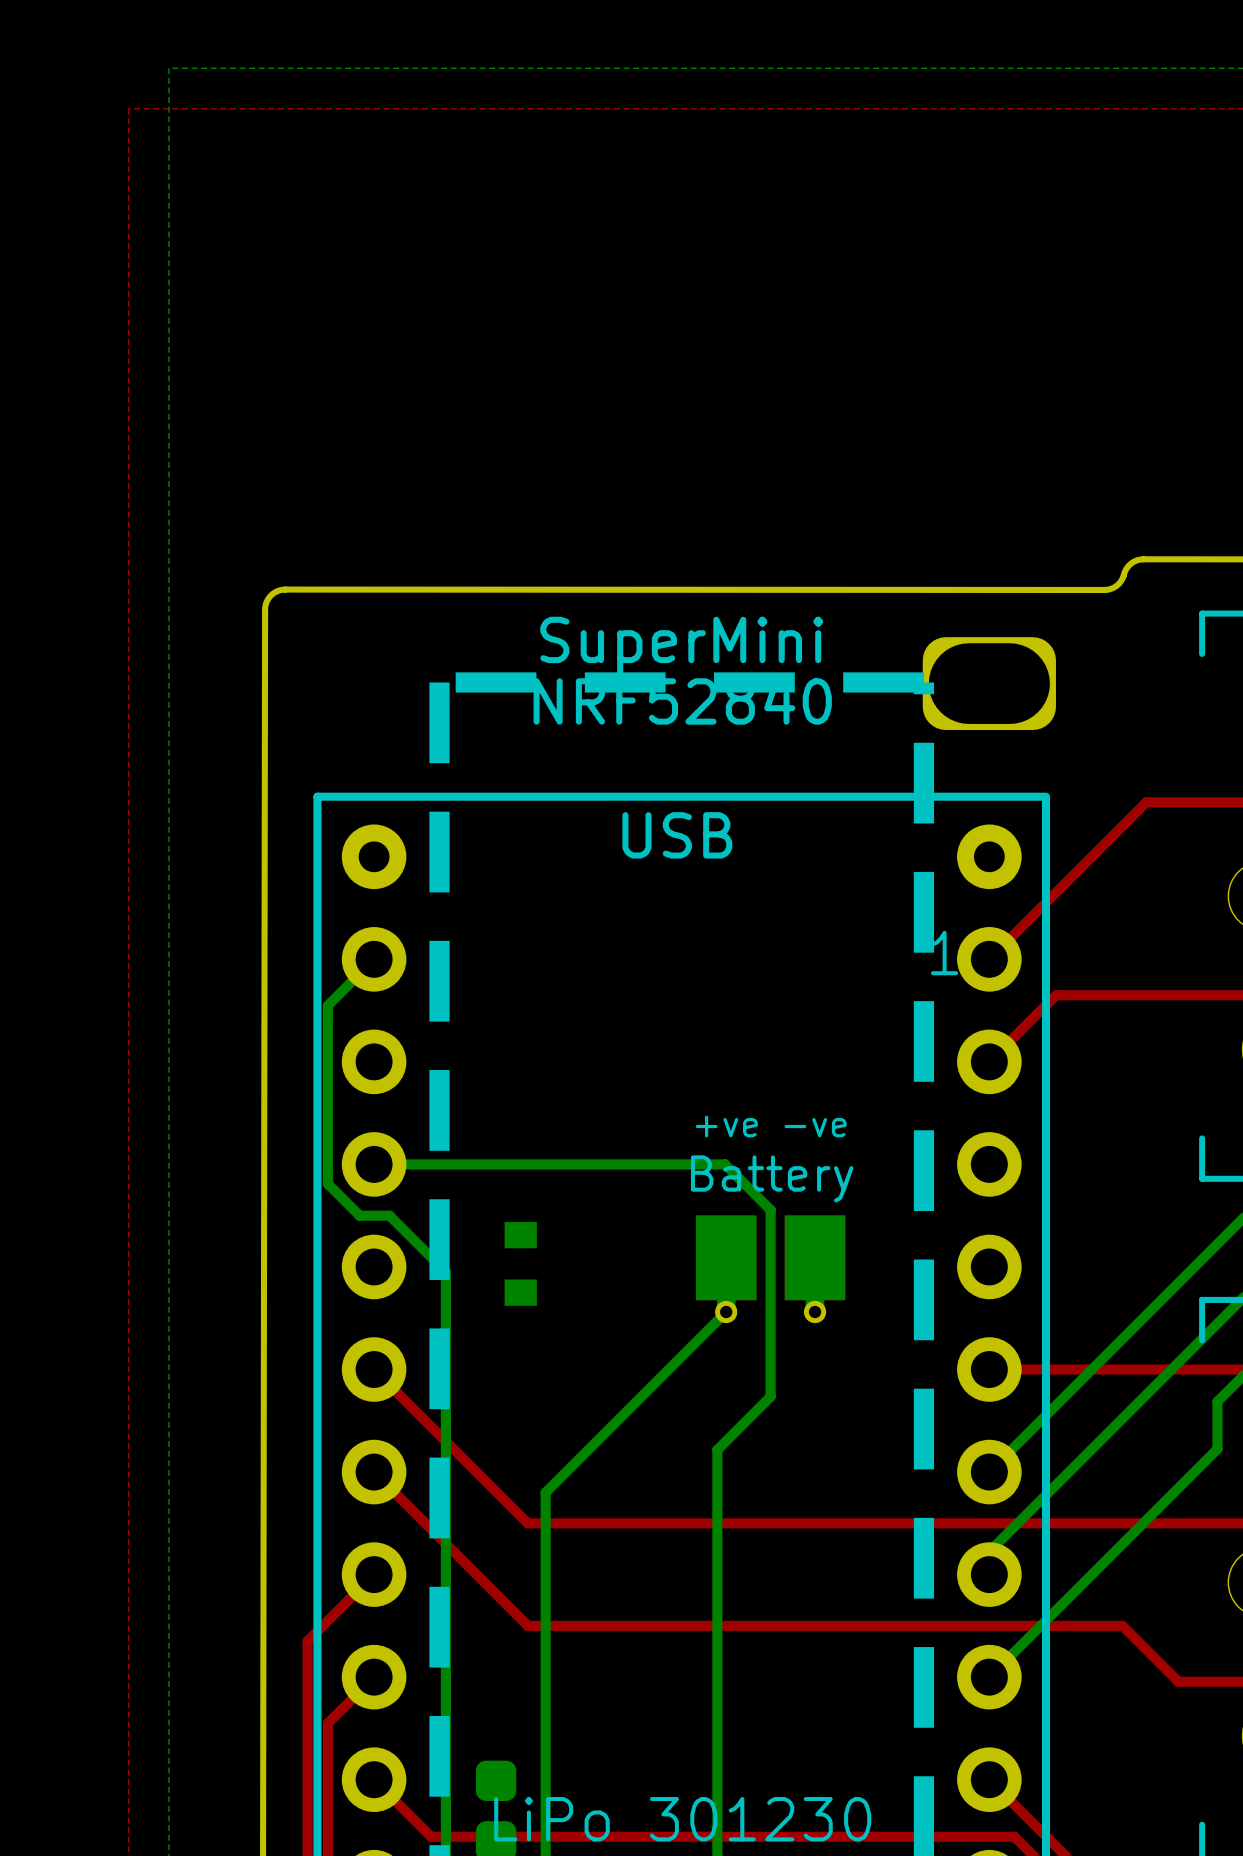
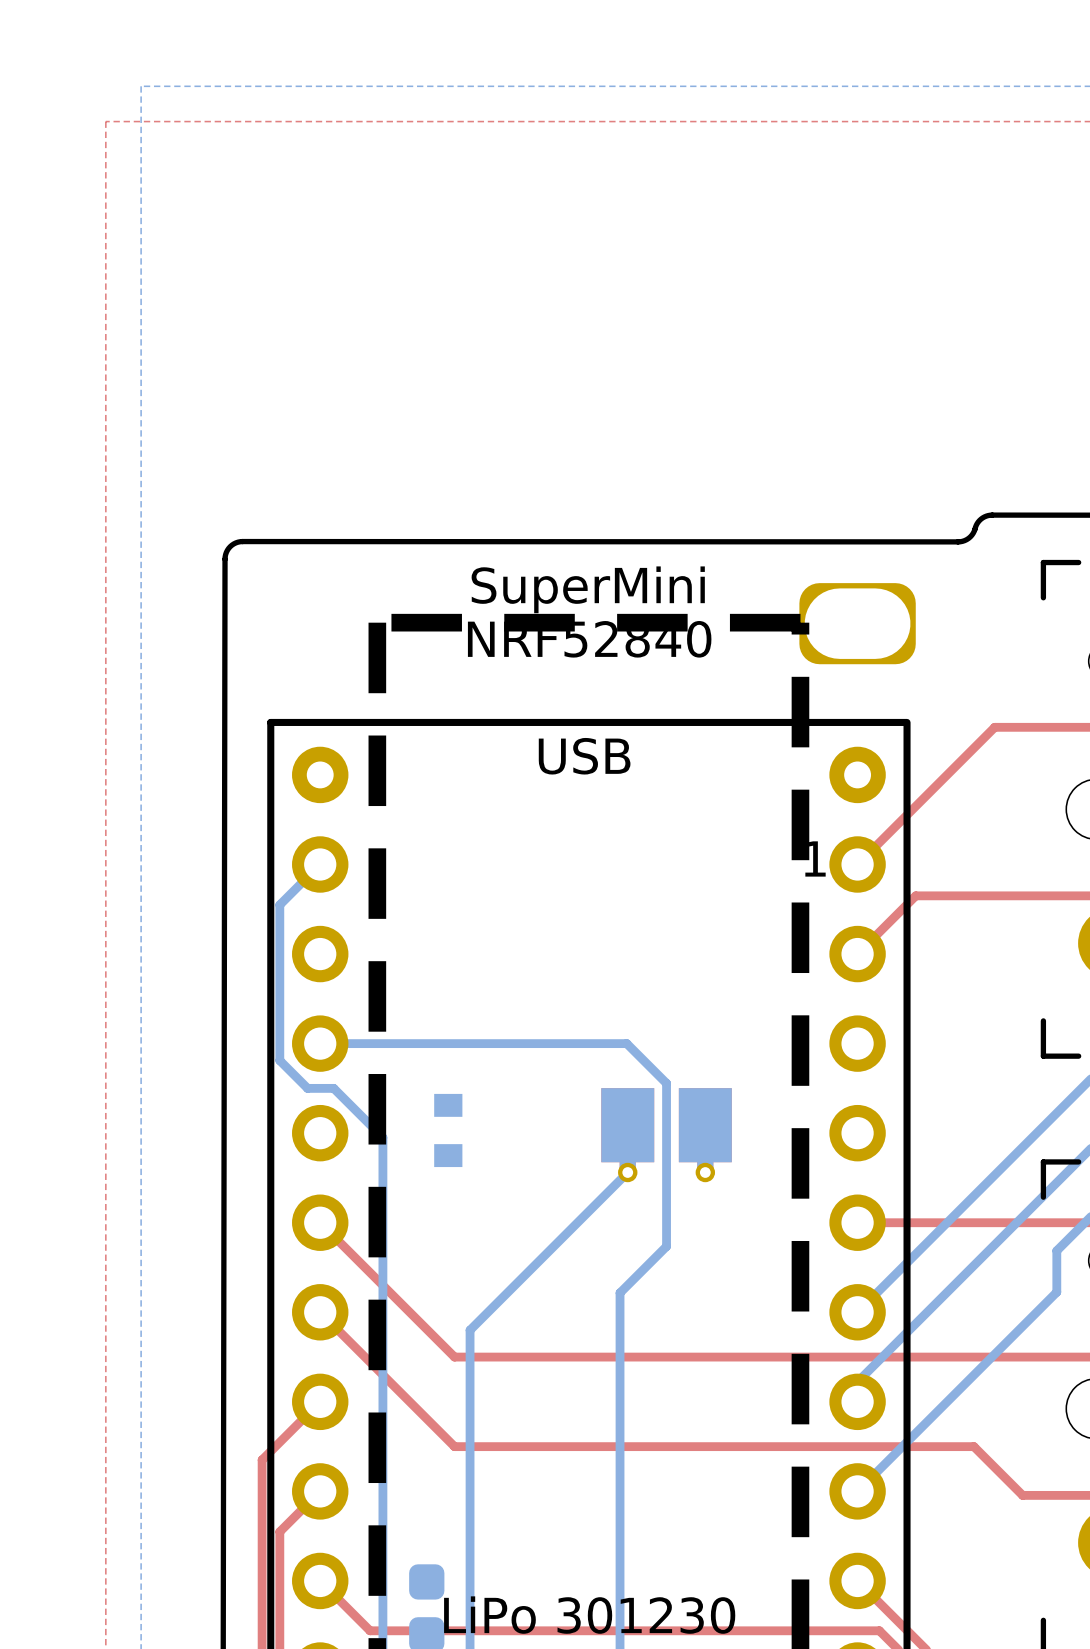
text: +ve (726, 1126) -> none
text: -ve (815, 1127) -> none
text: Battery (772, 1178) -> none

